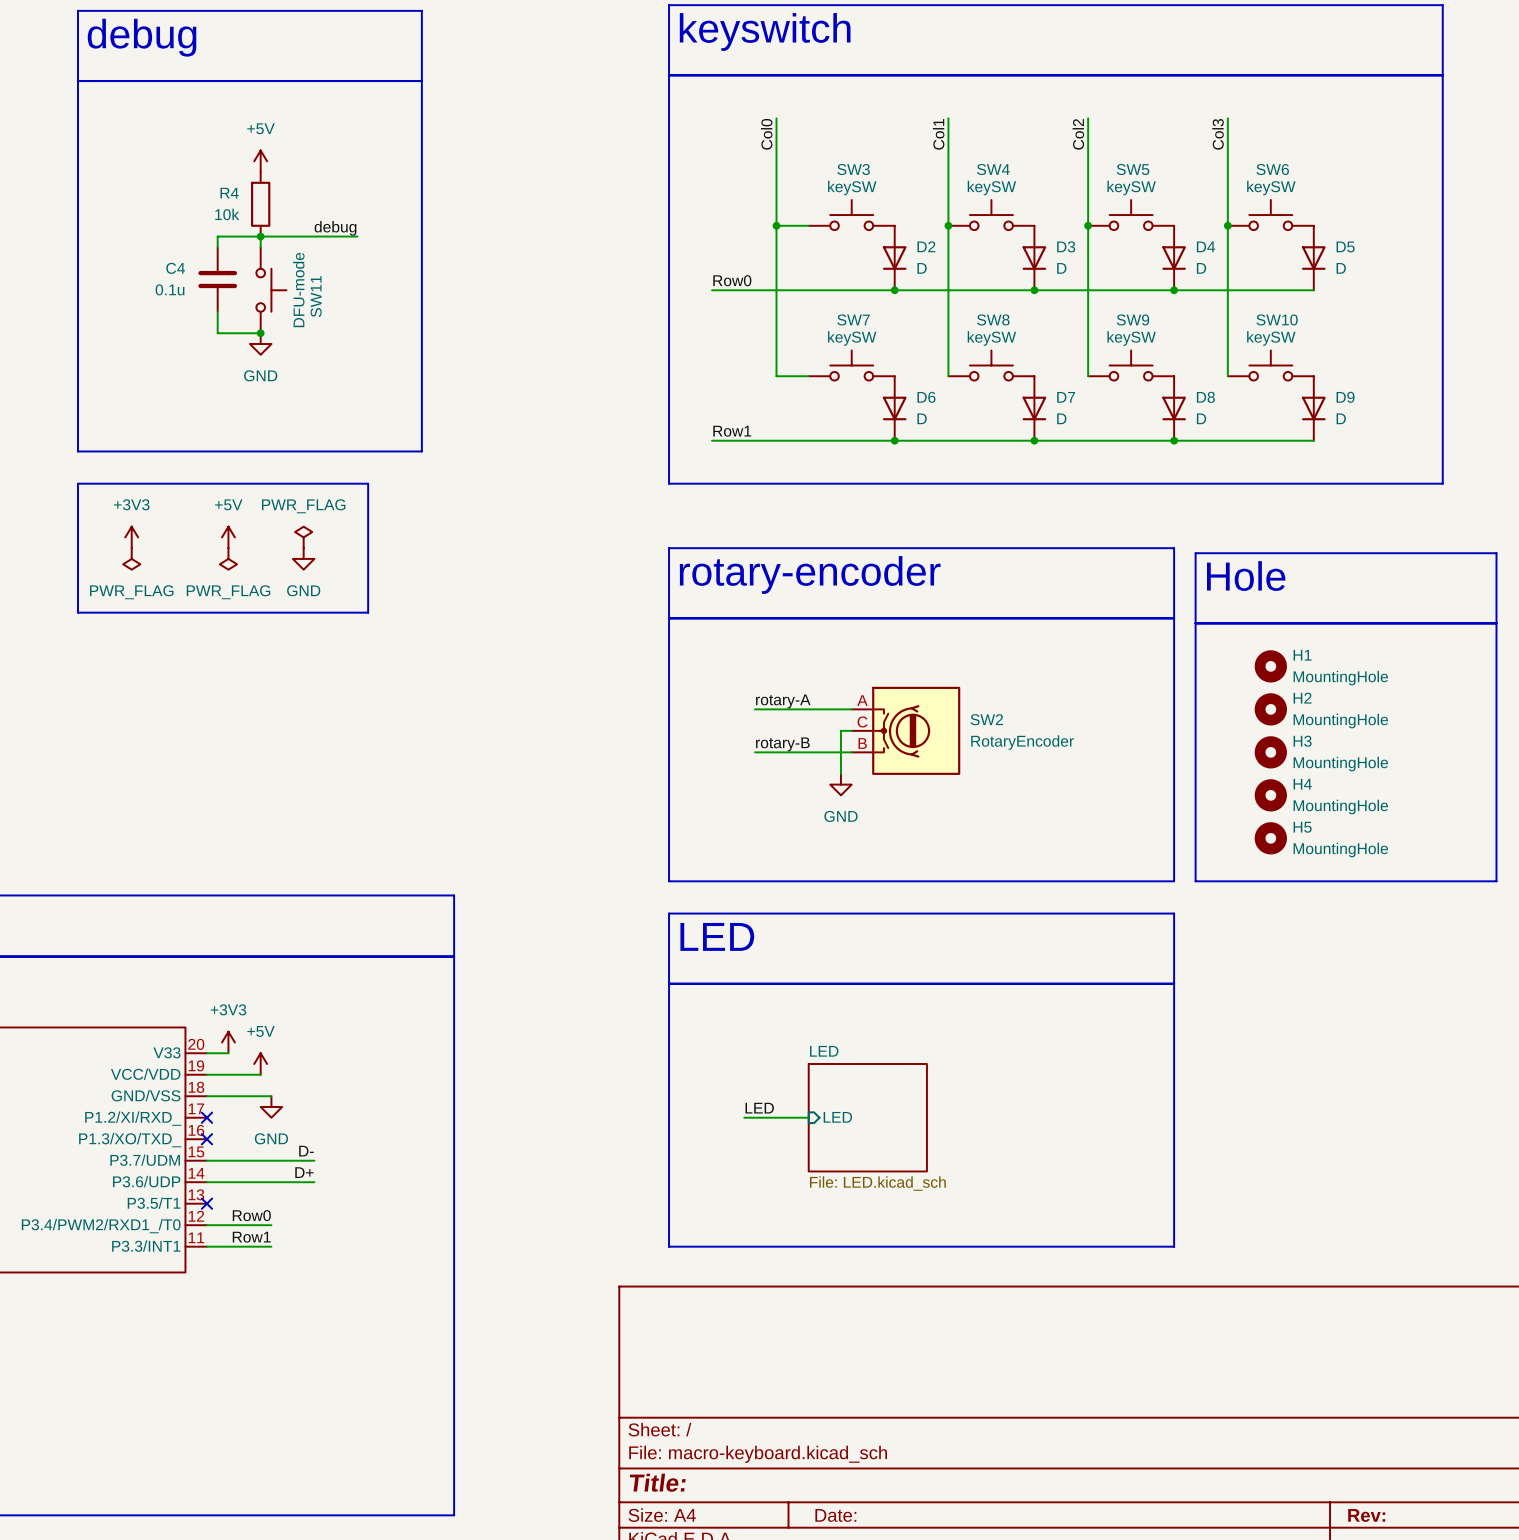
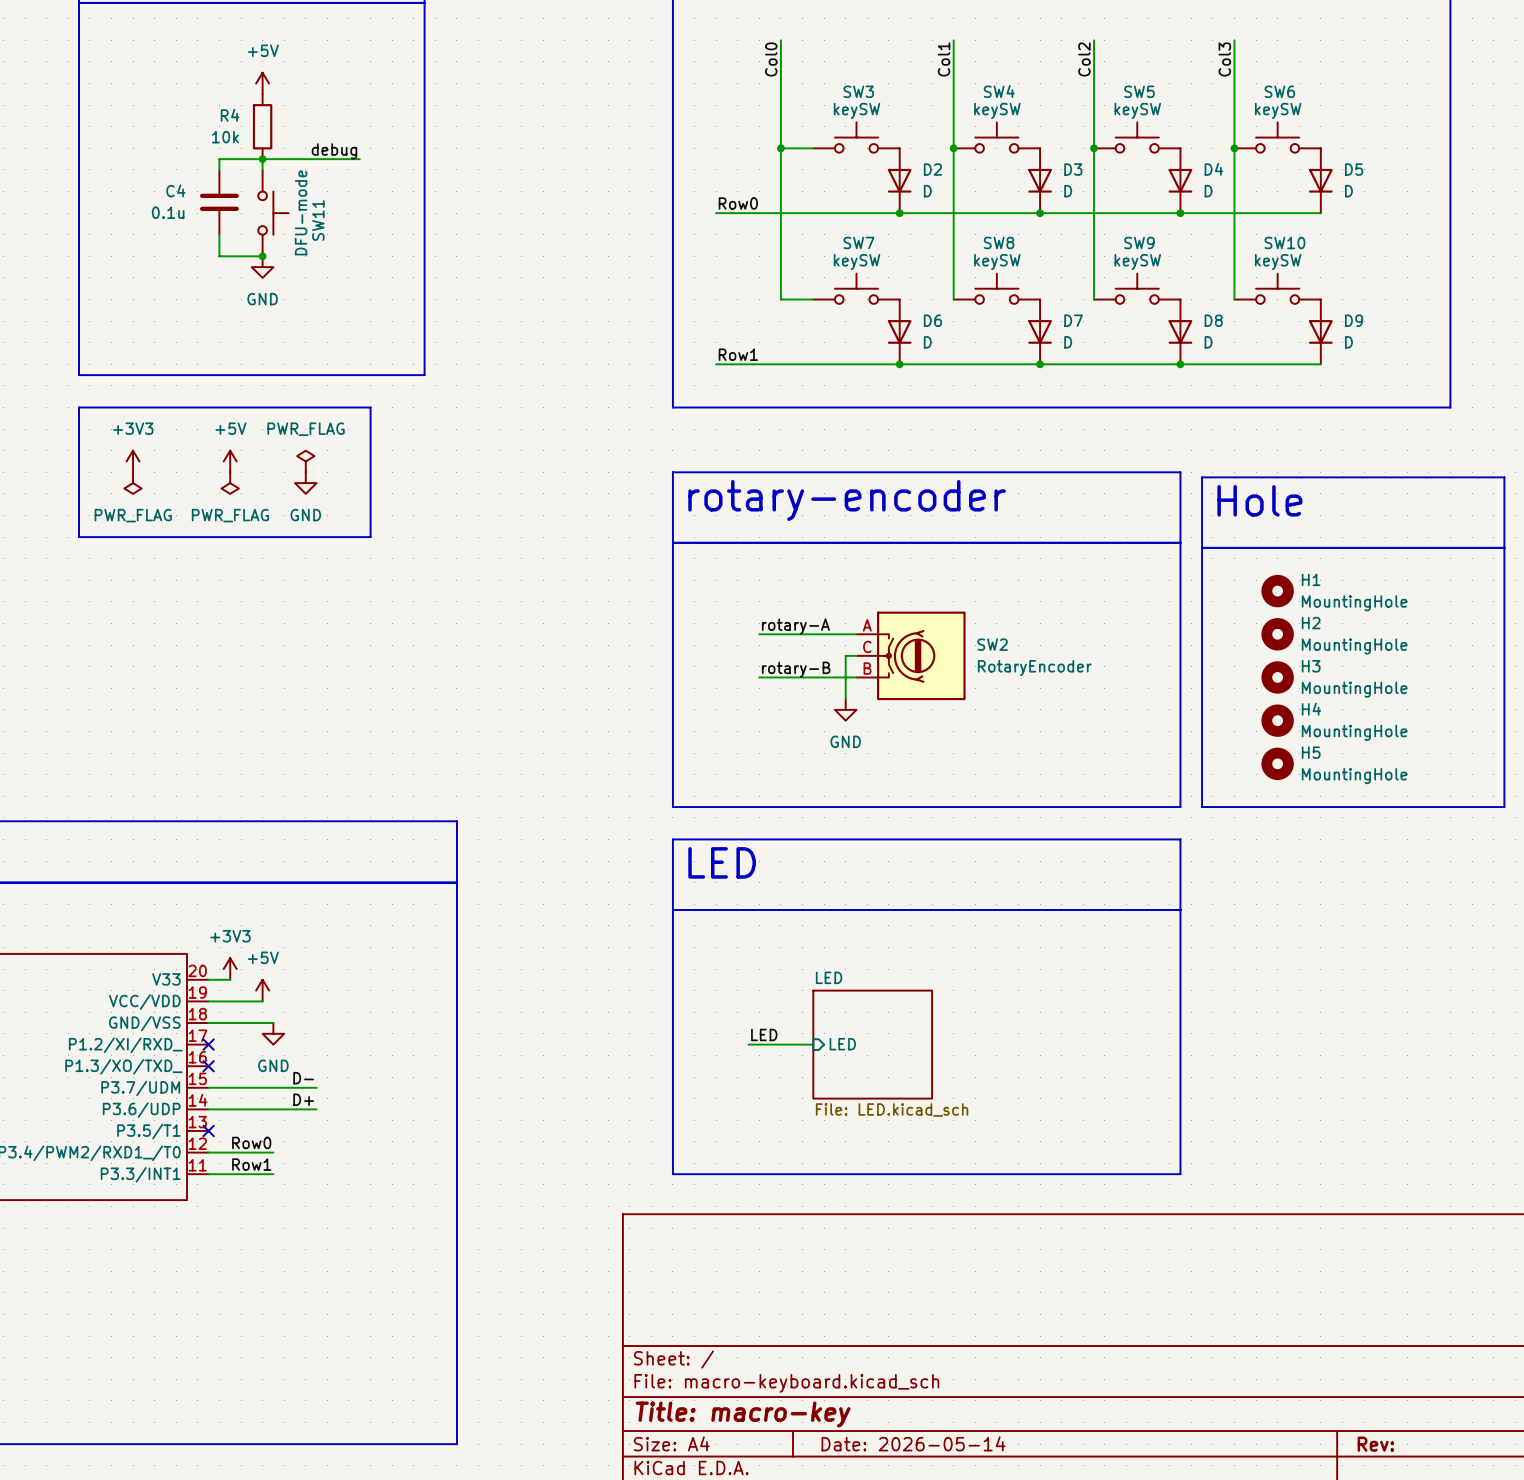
title block: Title: (657, 1482) -> Title: macro-key (743, 1414)
title block: Date: (835, 1515) -> Date: 2026-05-14 (913, 1443)

